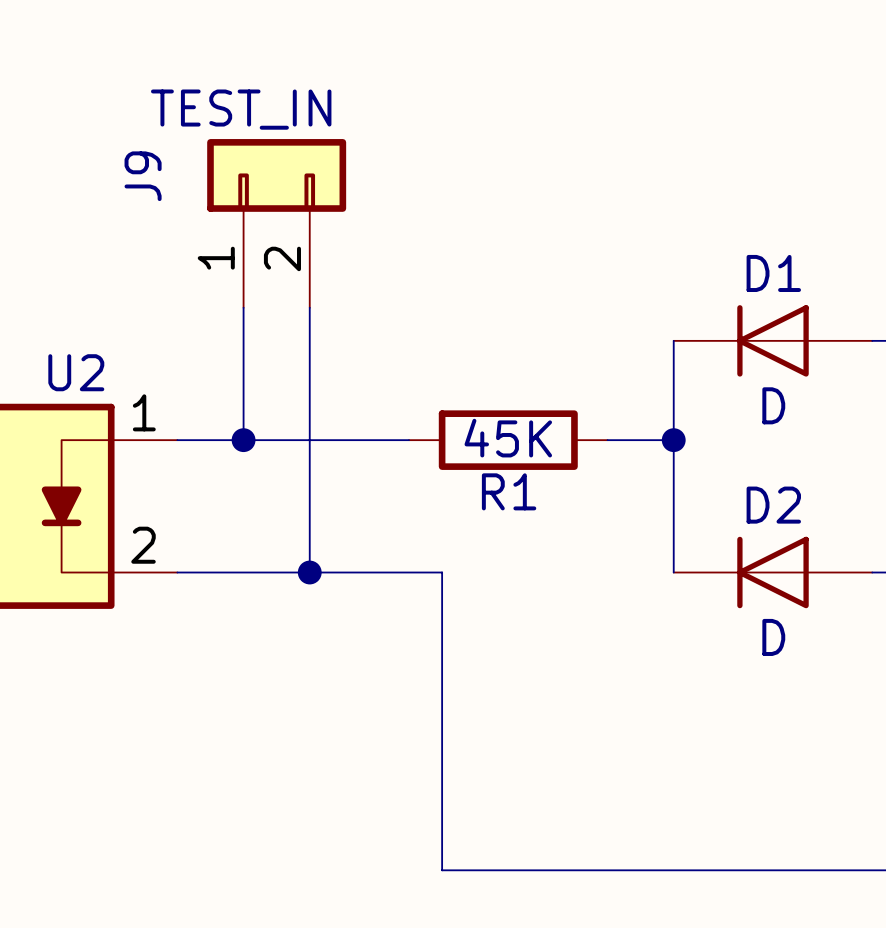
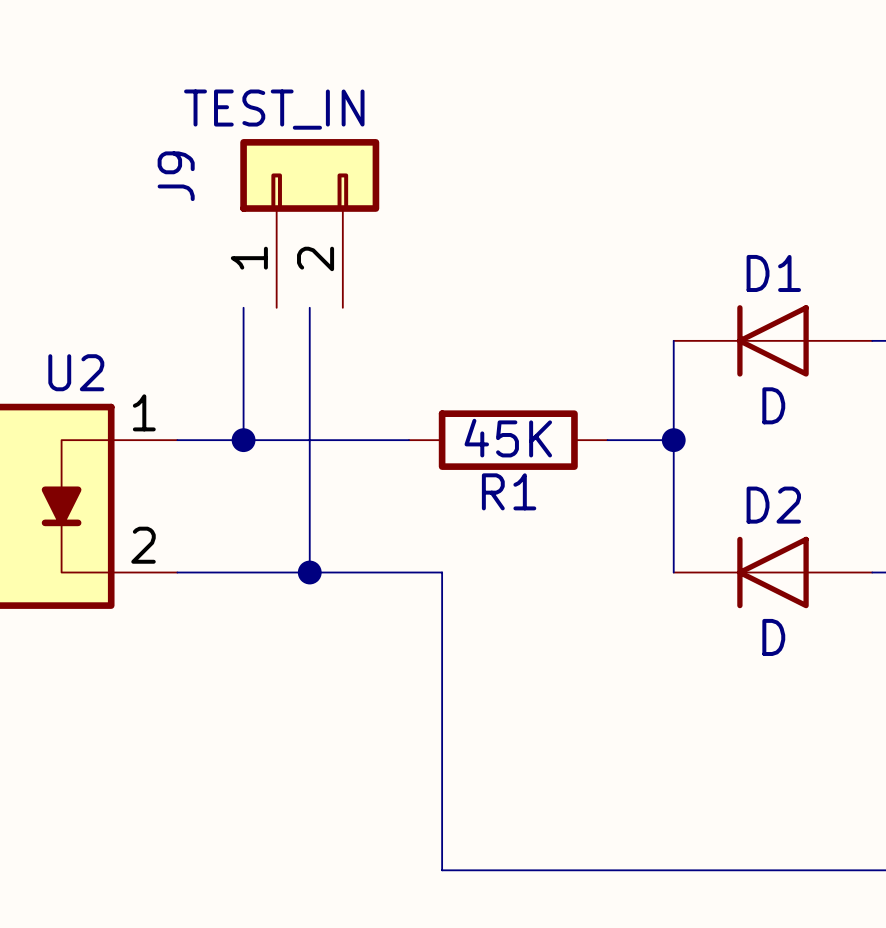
J9 position: (276, 223) -> (309, 223)

